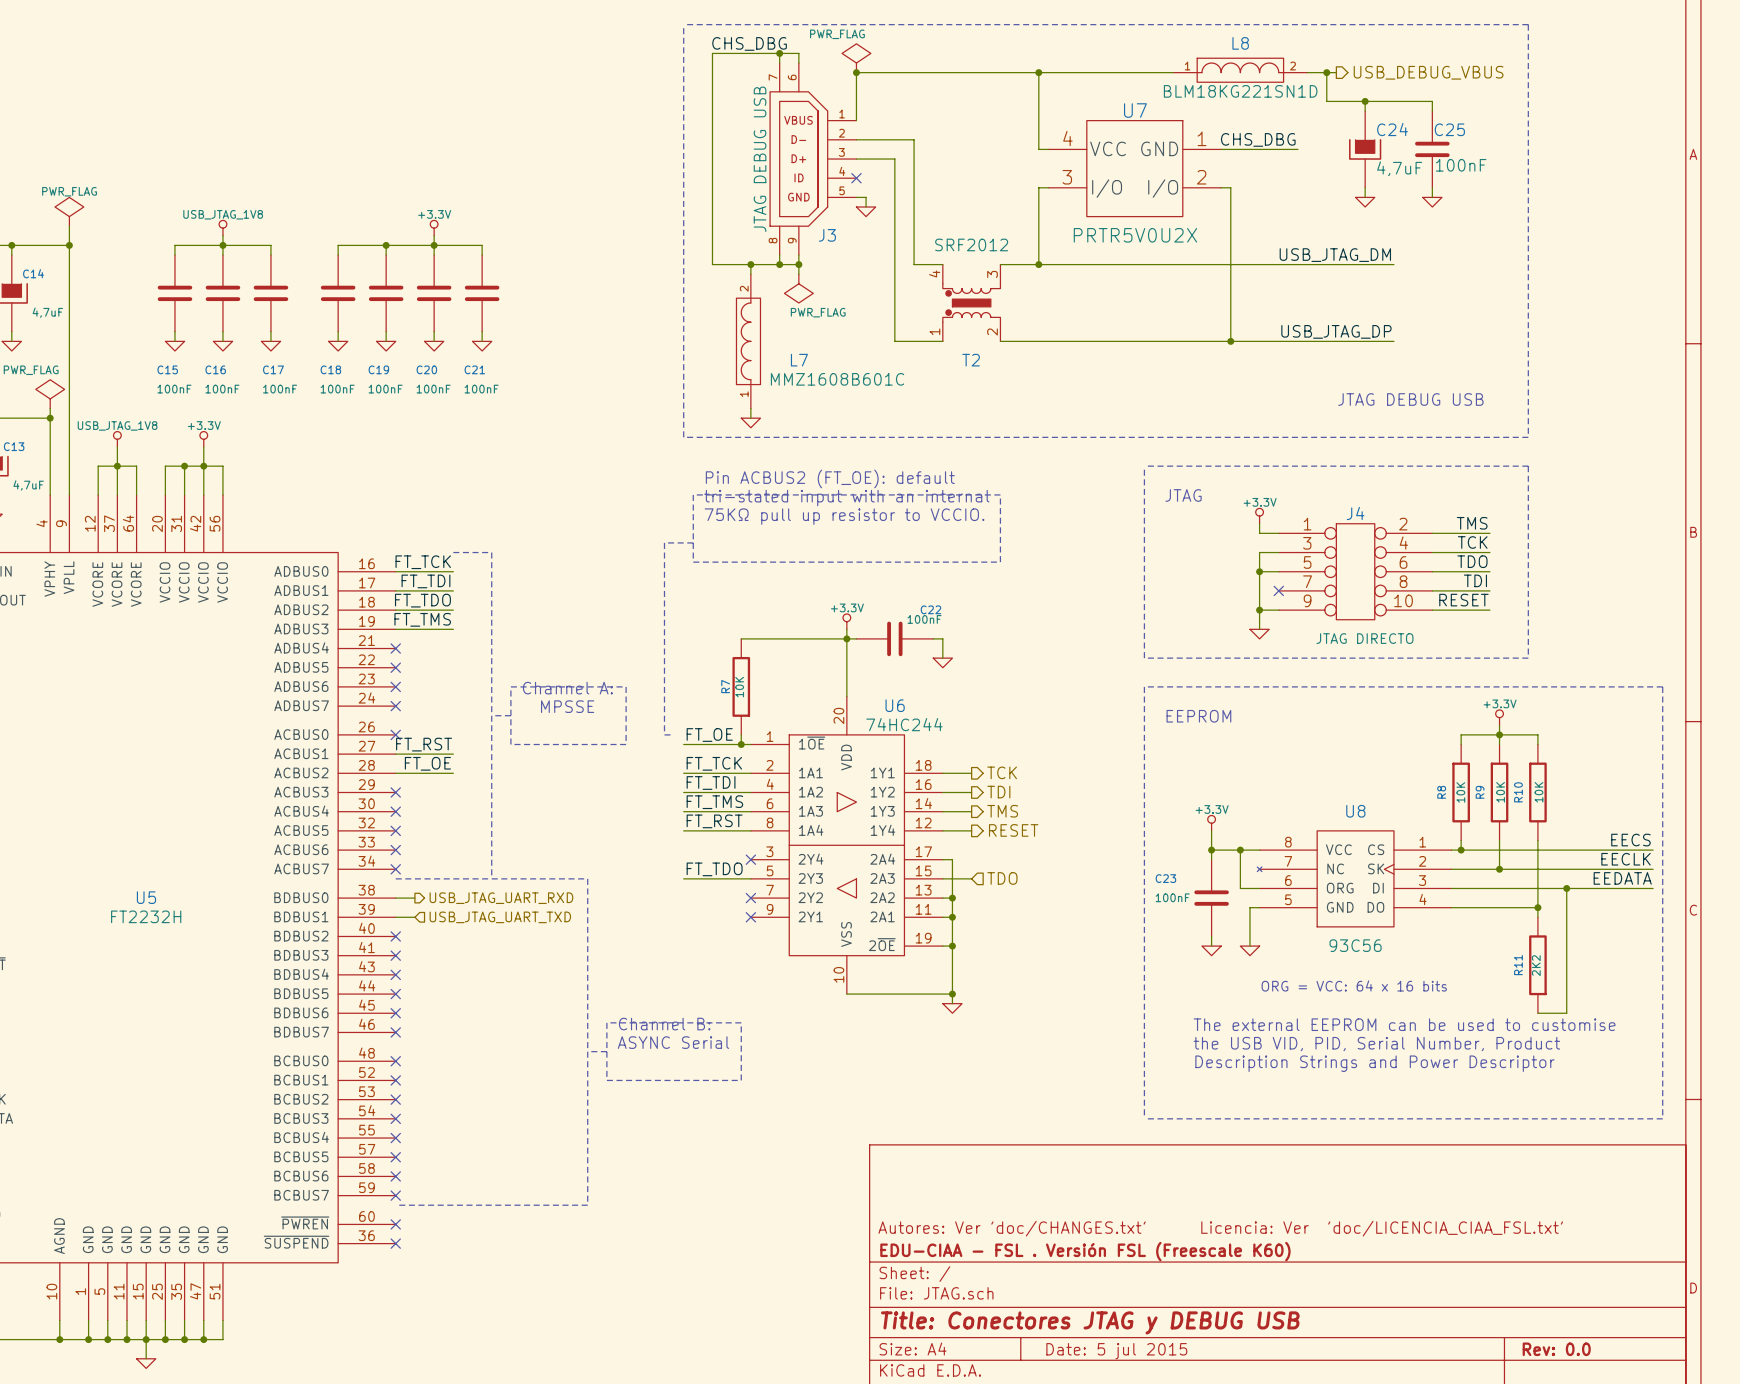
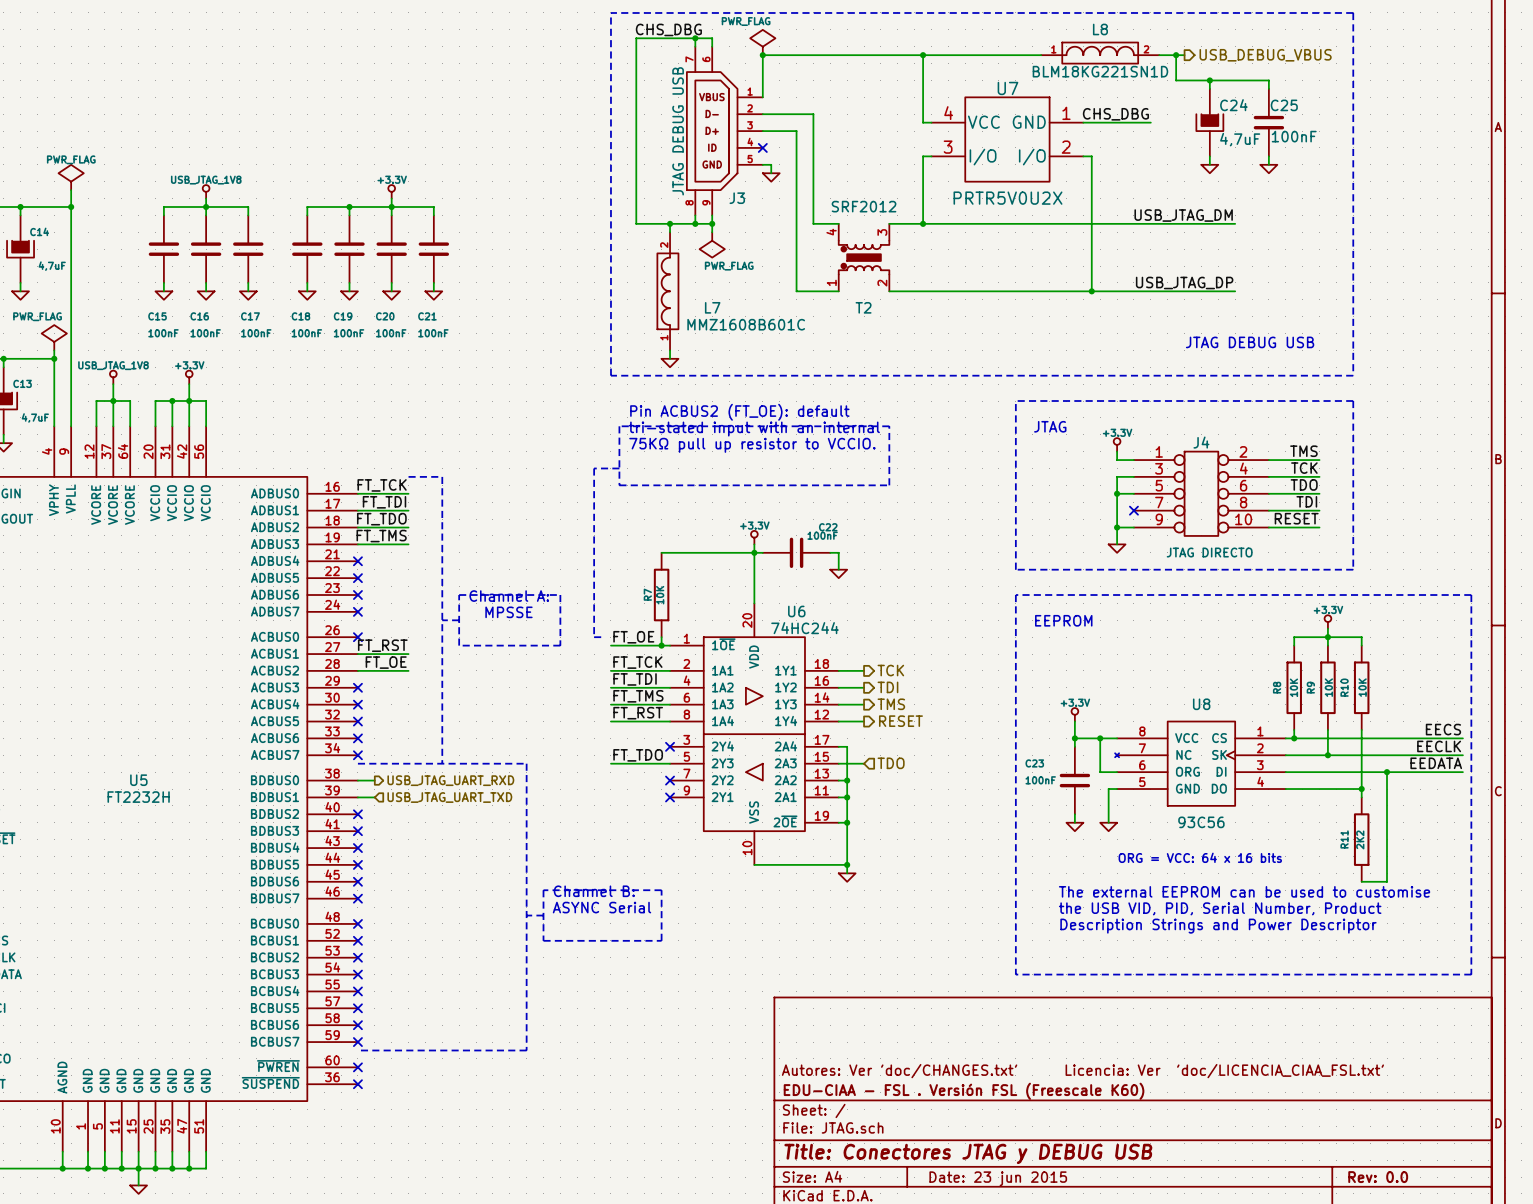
title block: Date: 5 jul 2015 (1116, 1351) -> Date: 23 jun 2015 (998, 1178)

